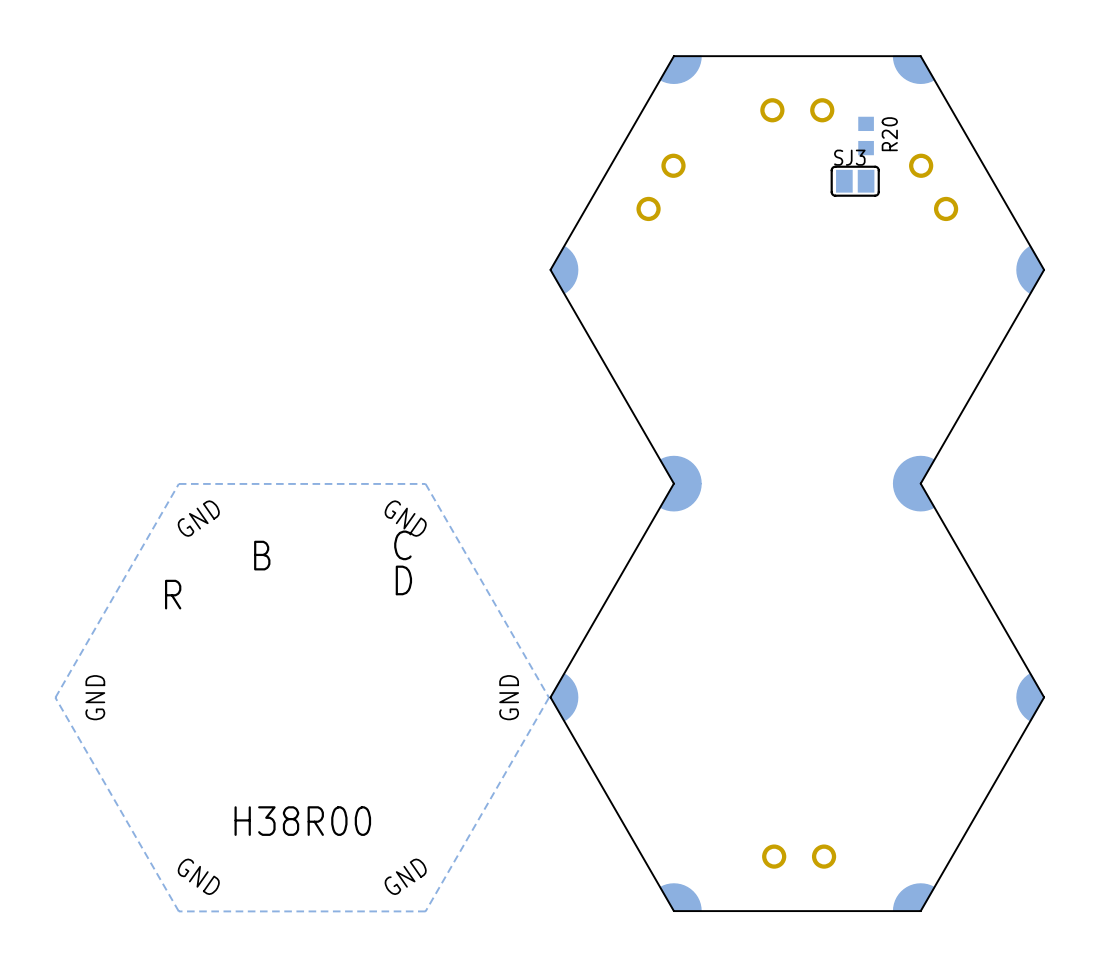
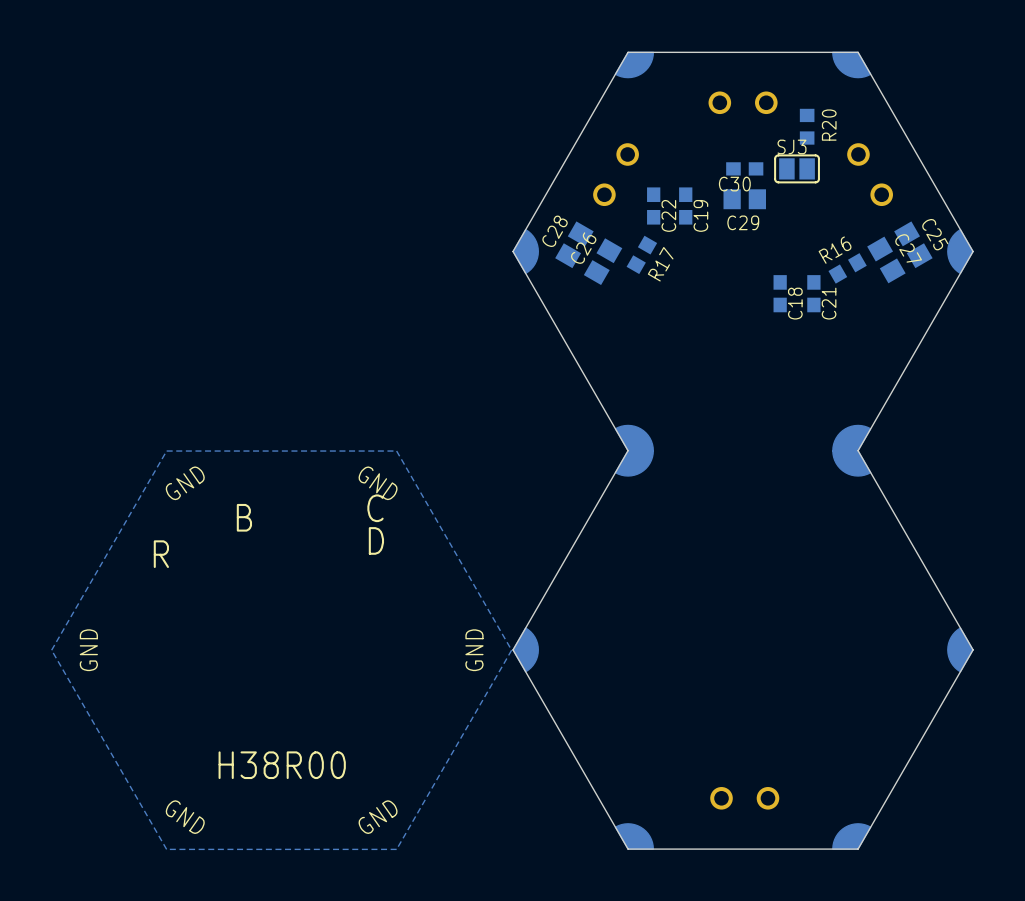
C30: none -> (744, 168)
C29: none -> (744, 199)
C22: none -> (653, 205)
C19: none -> (685, 205)
C28: none -> (574, 244)
C25: none -> (913, 244)
R17: none -> (641, 254)
C27: none -> (886, 259)
C26: none -> (603, 261)
R16: none -> (847, 268)
C18: none -> (780, 293)
C21: none -> (813, 293)

